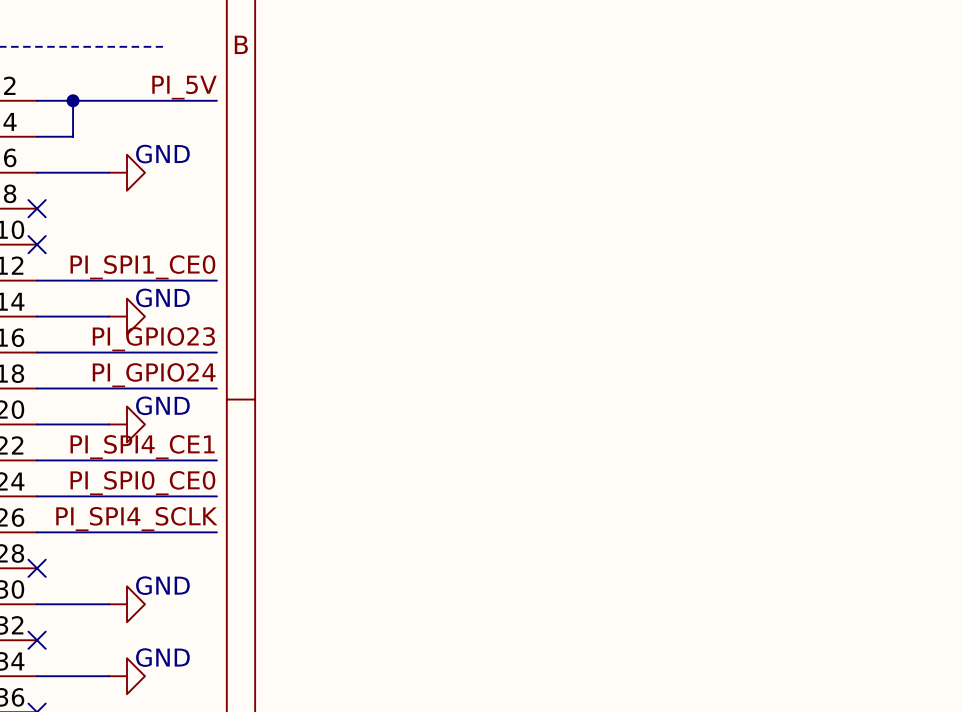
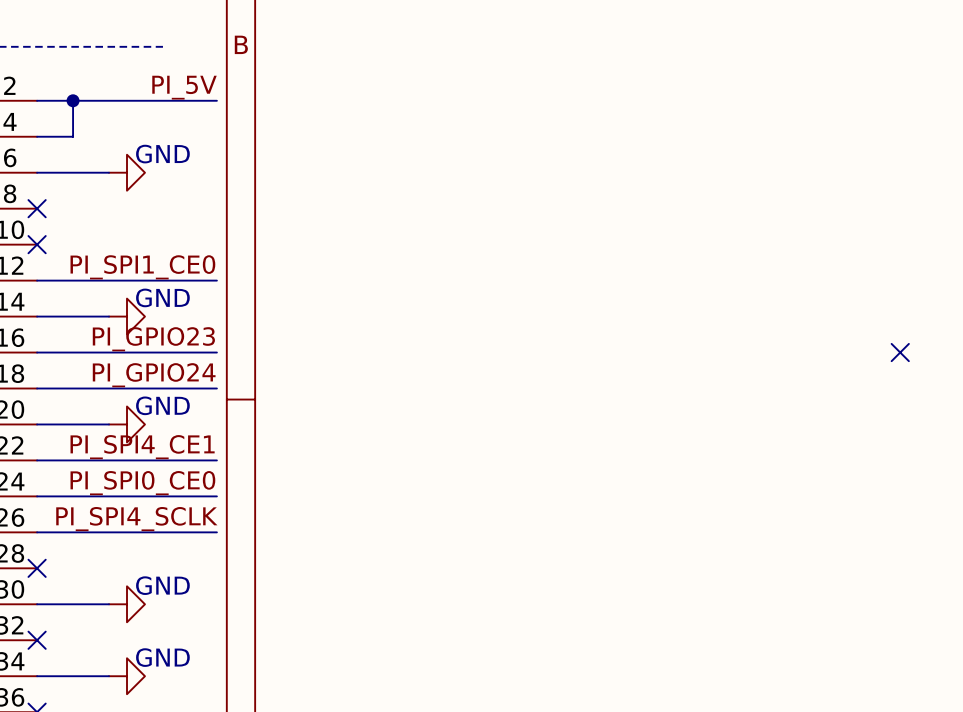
no-connect mark: none -> (900, 352)

